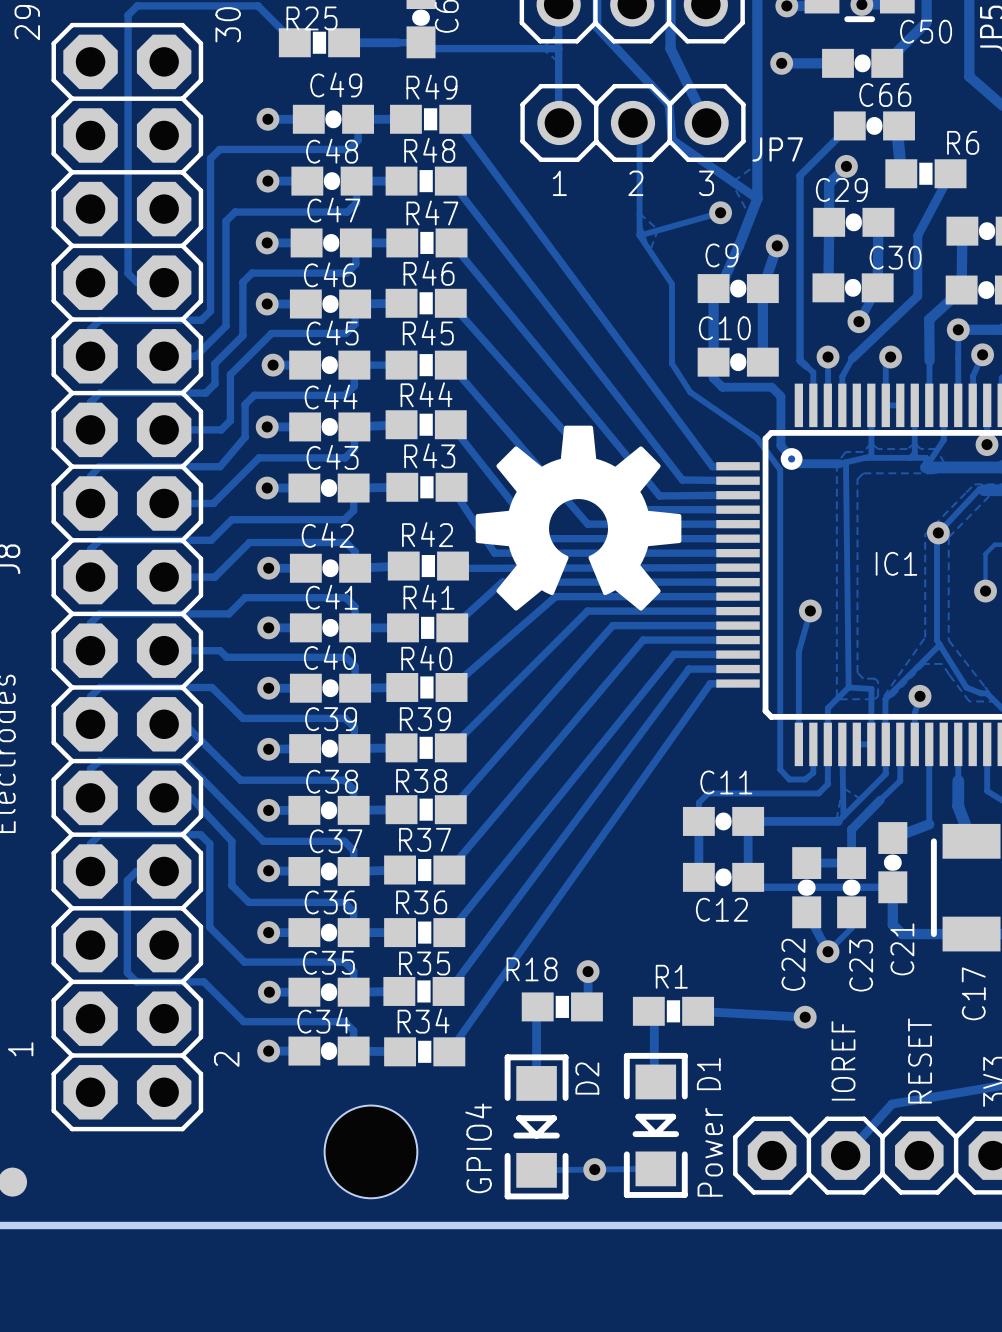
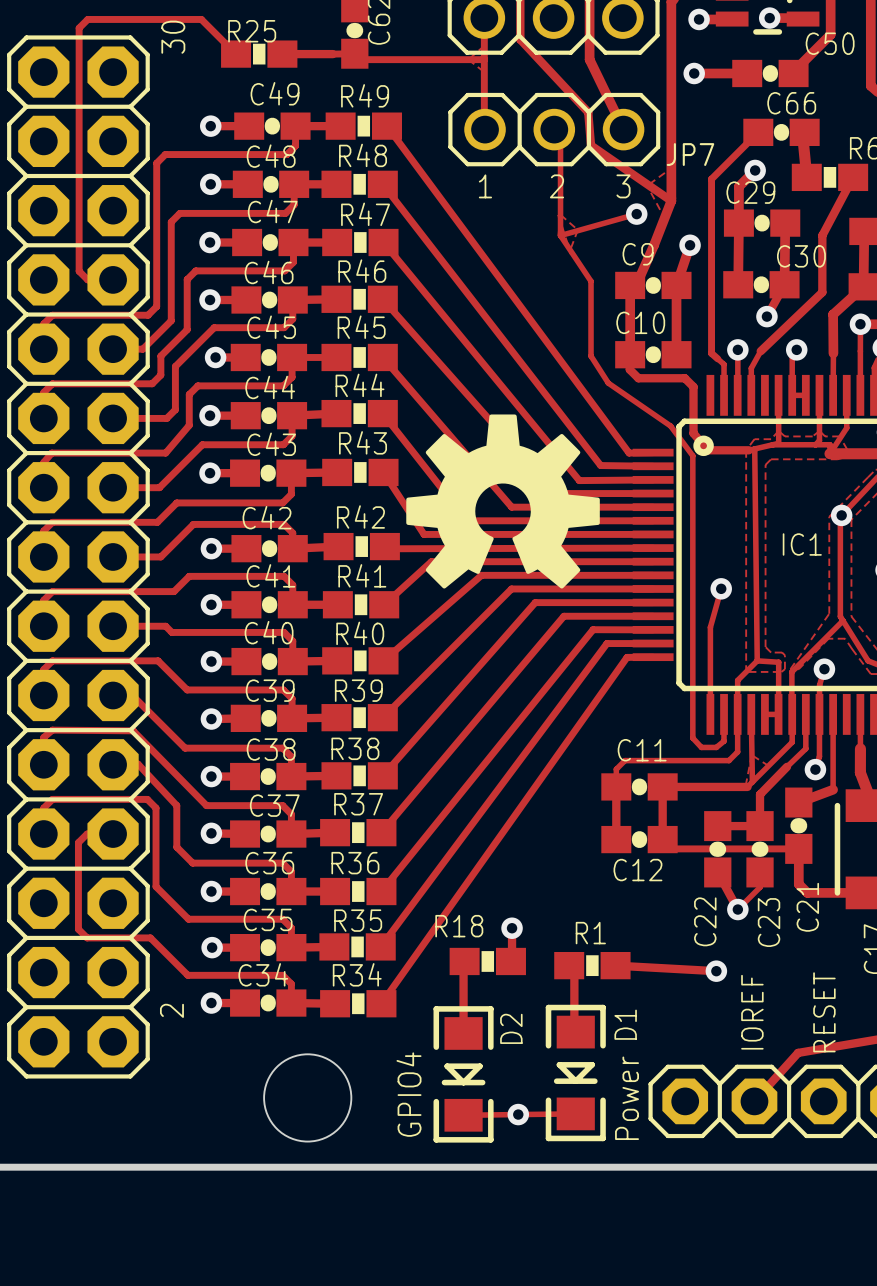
track: none -> (819, 714) (819, 756) (815, 769)
via: none -> (815, 769)

